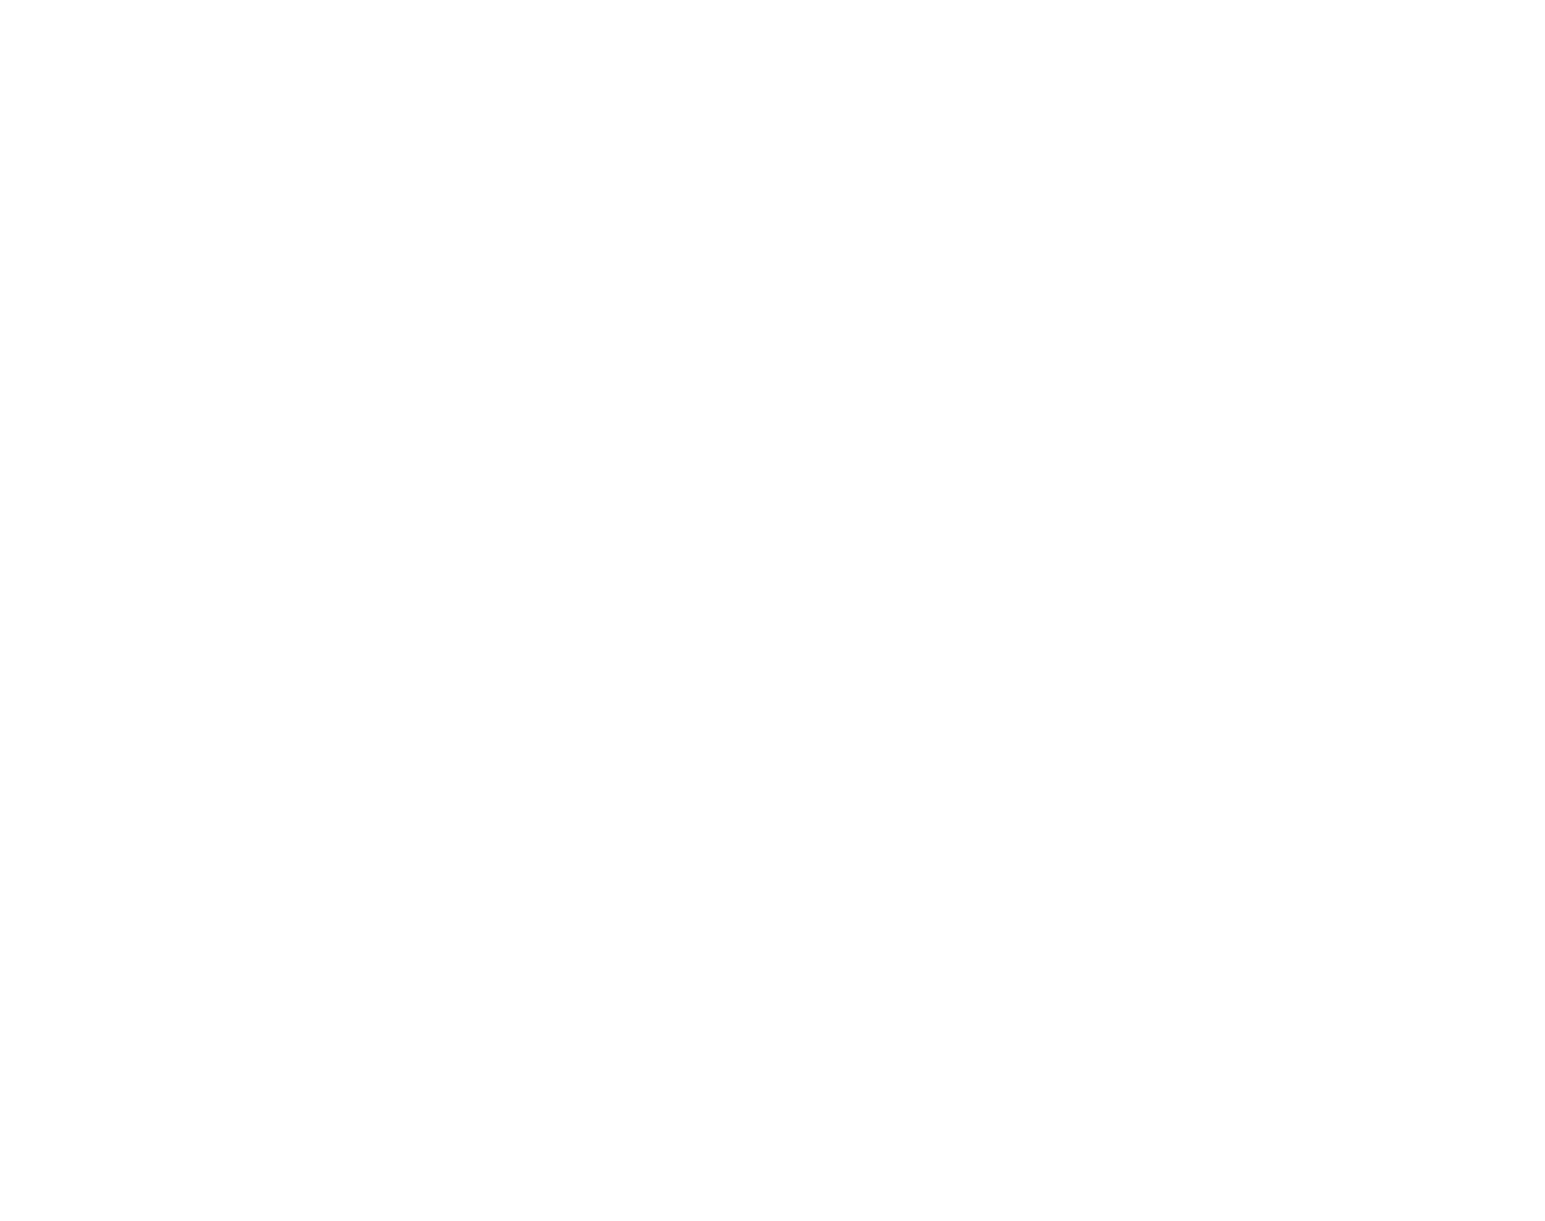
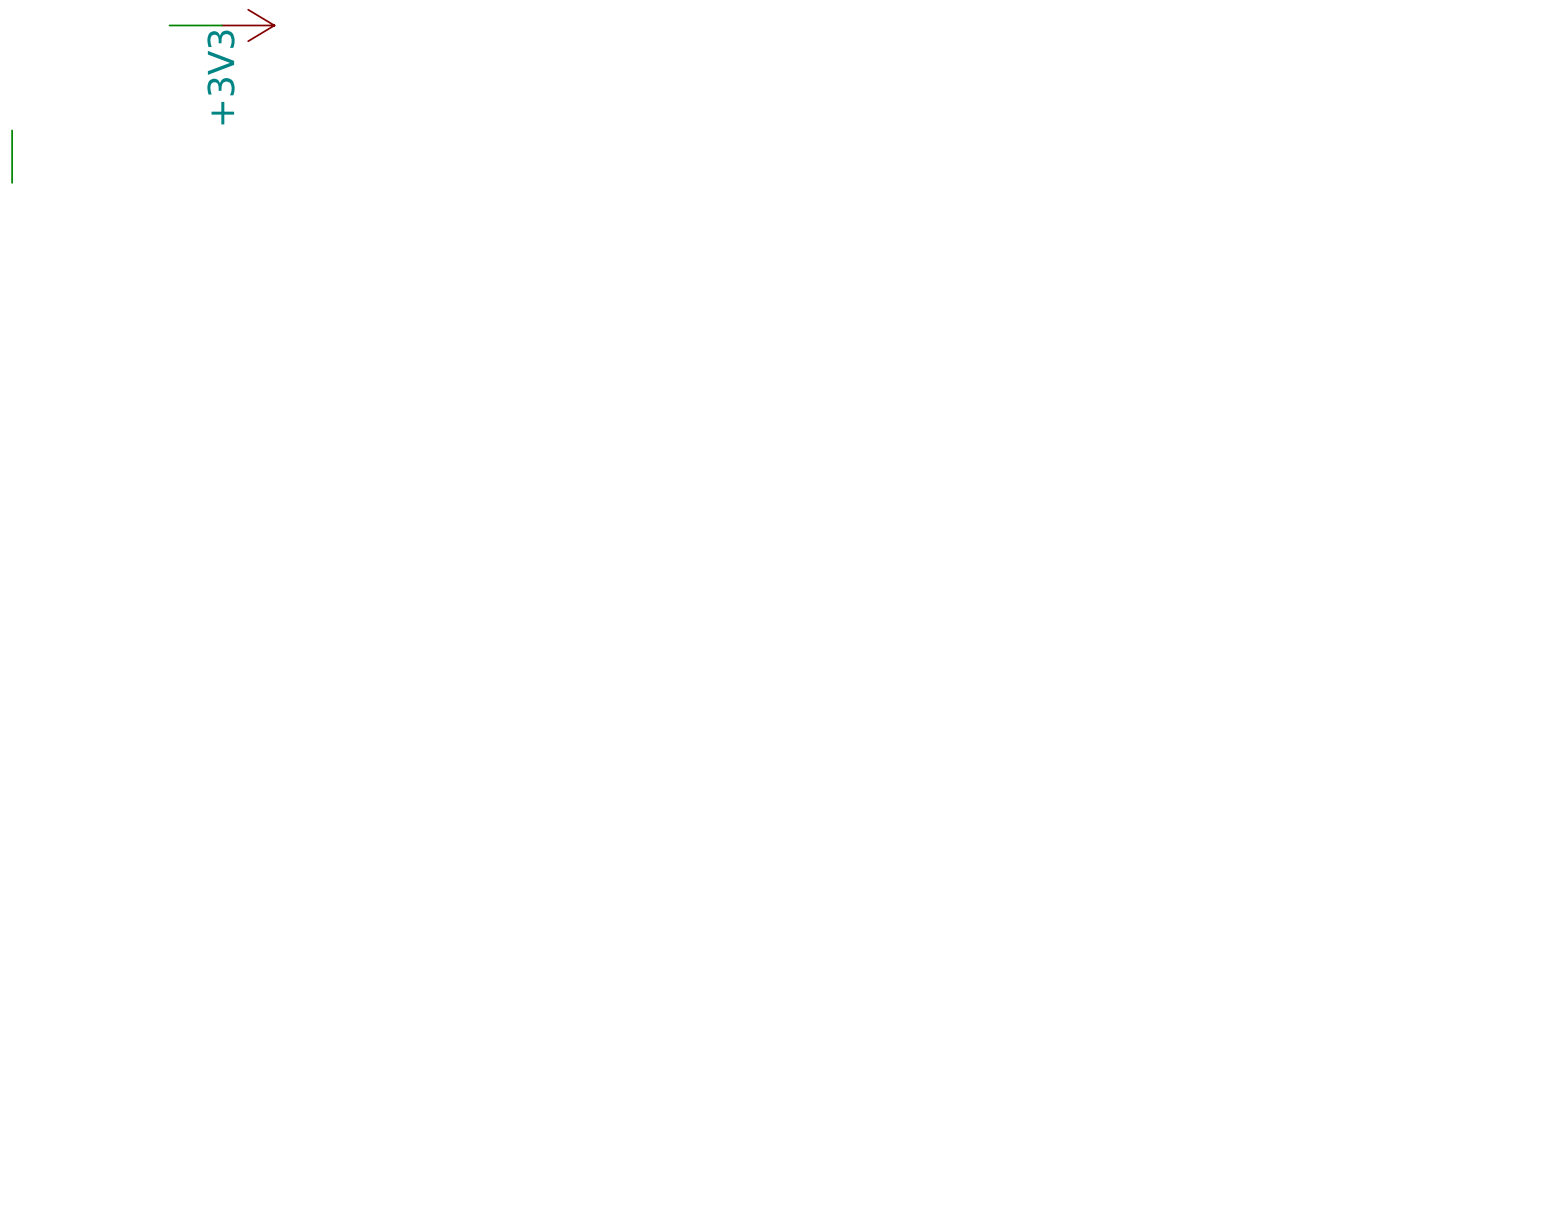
wire: none -> (169, 25) (221, 25)
power symbol: none -> +3V3 (248, 25)
wire: none -> (12, 130) (12, 182)

